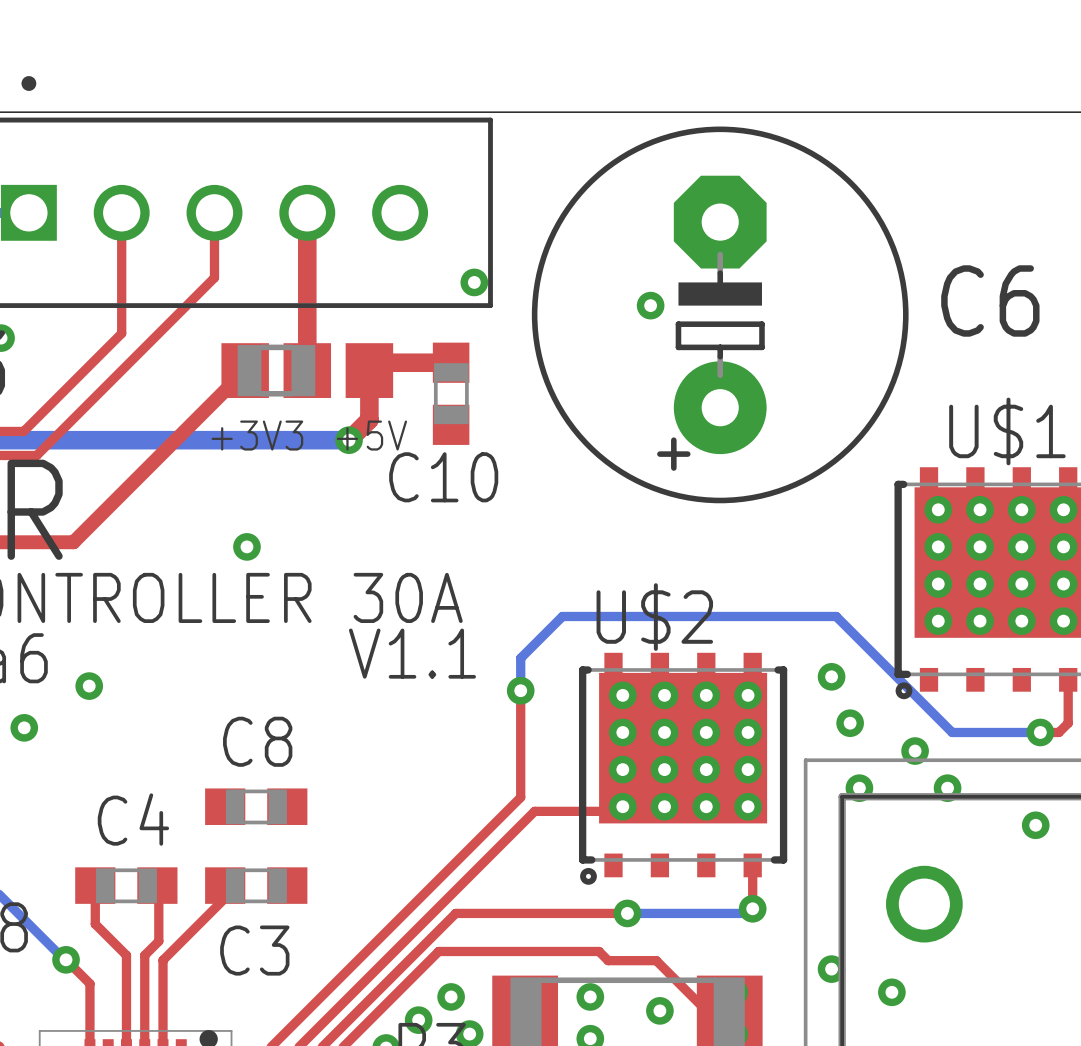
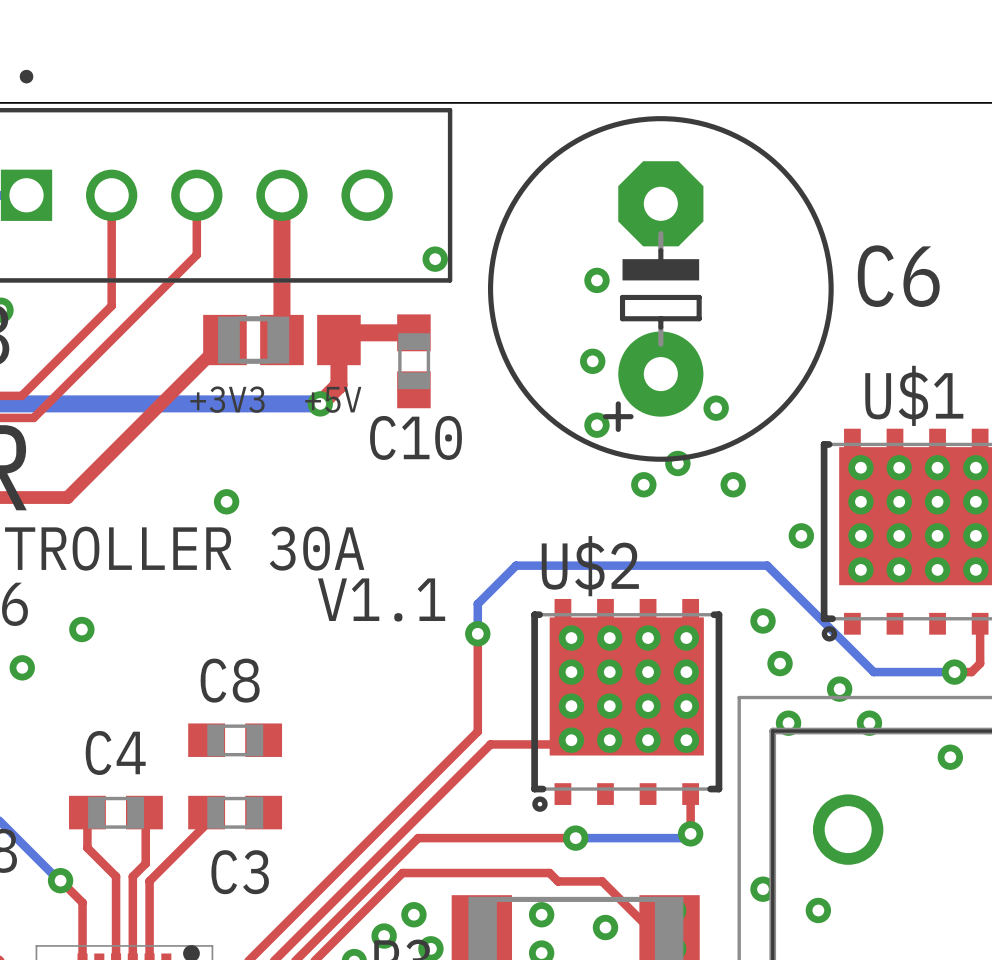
via: none -> (592, 361)
via: none -> (716, 408)
via: none -> (596, 425)
via: none -> (677, 463)
via: none -> (643, 484)
via: none -> (733, 484)
via: none -> (801, 535)

